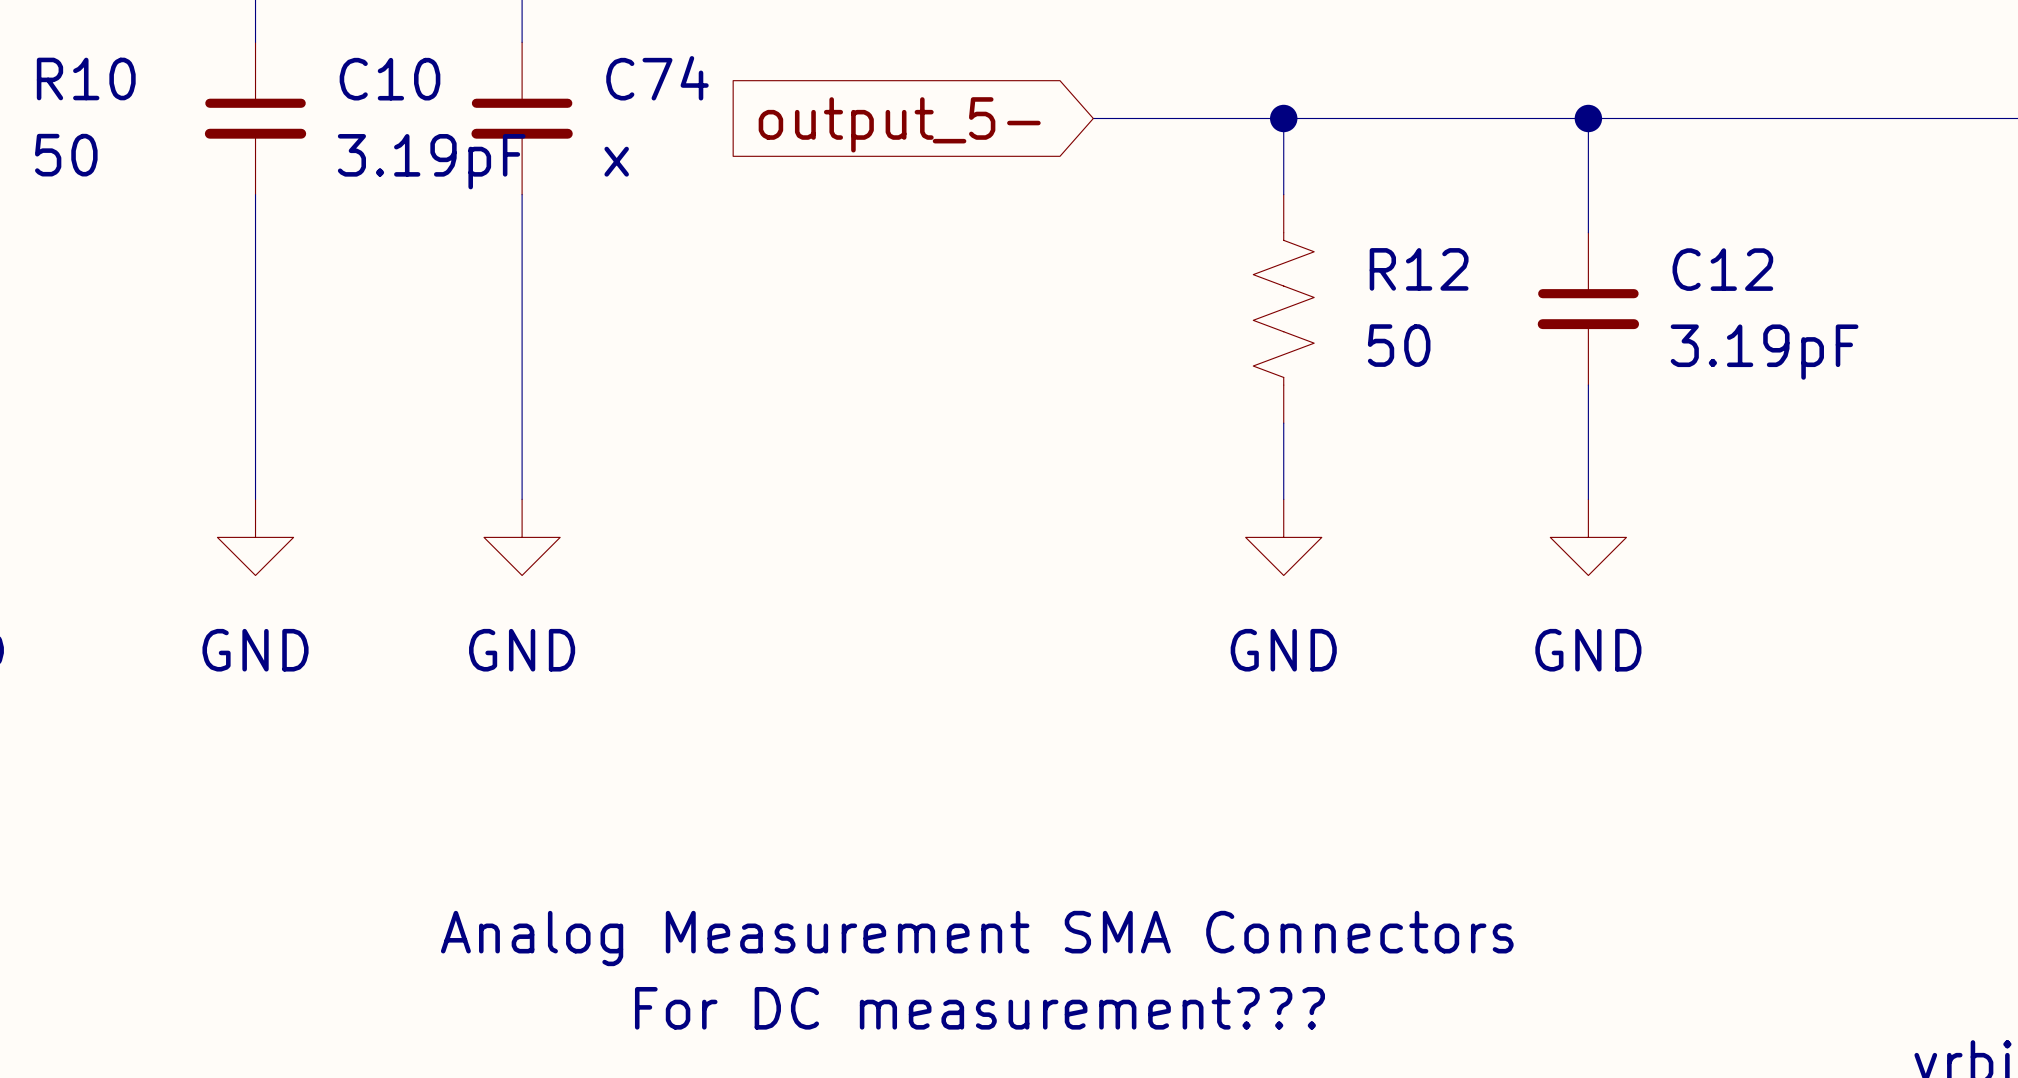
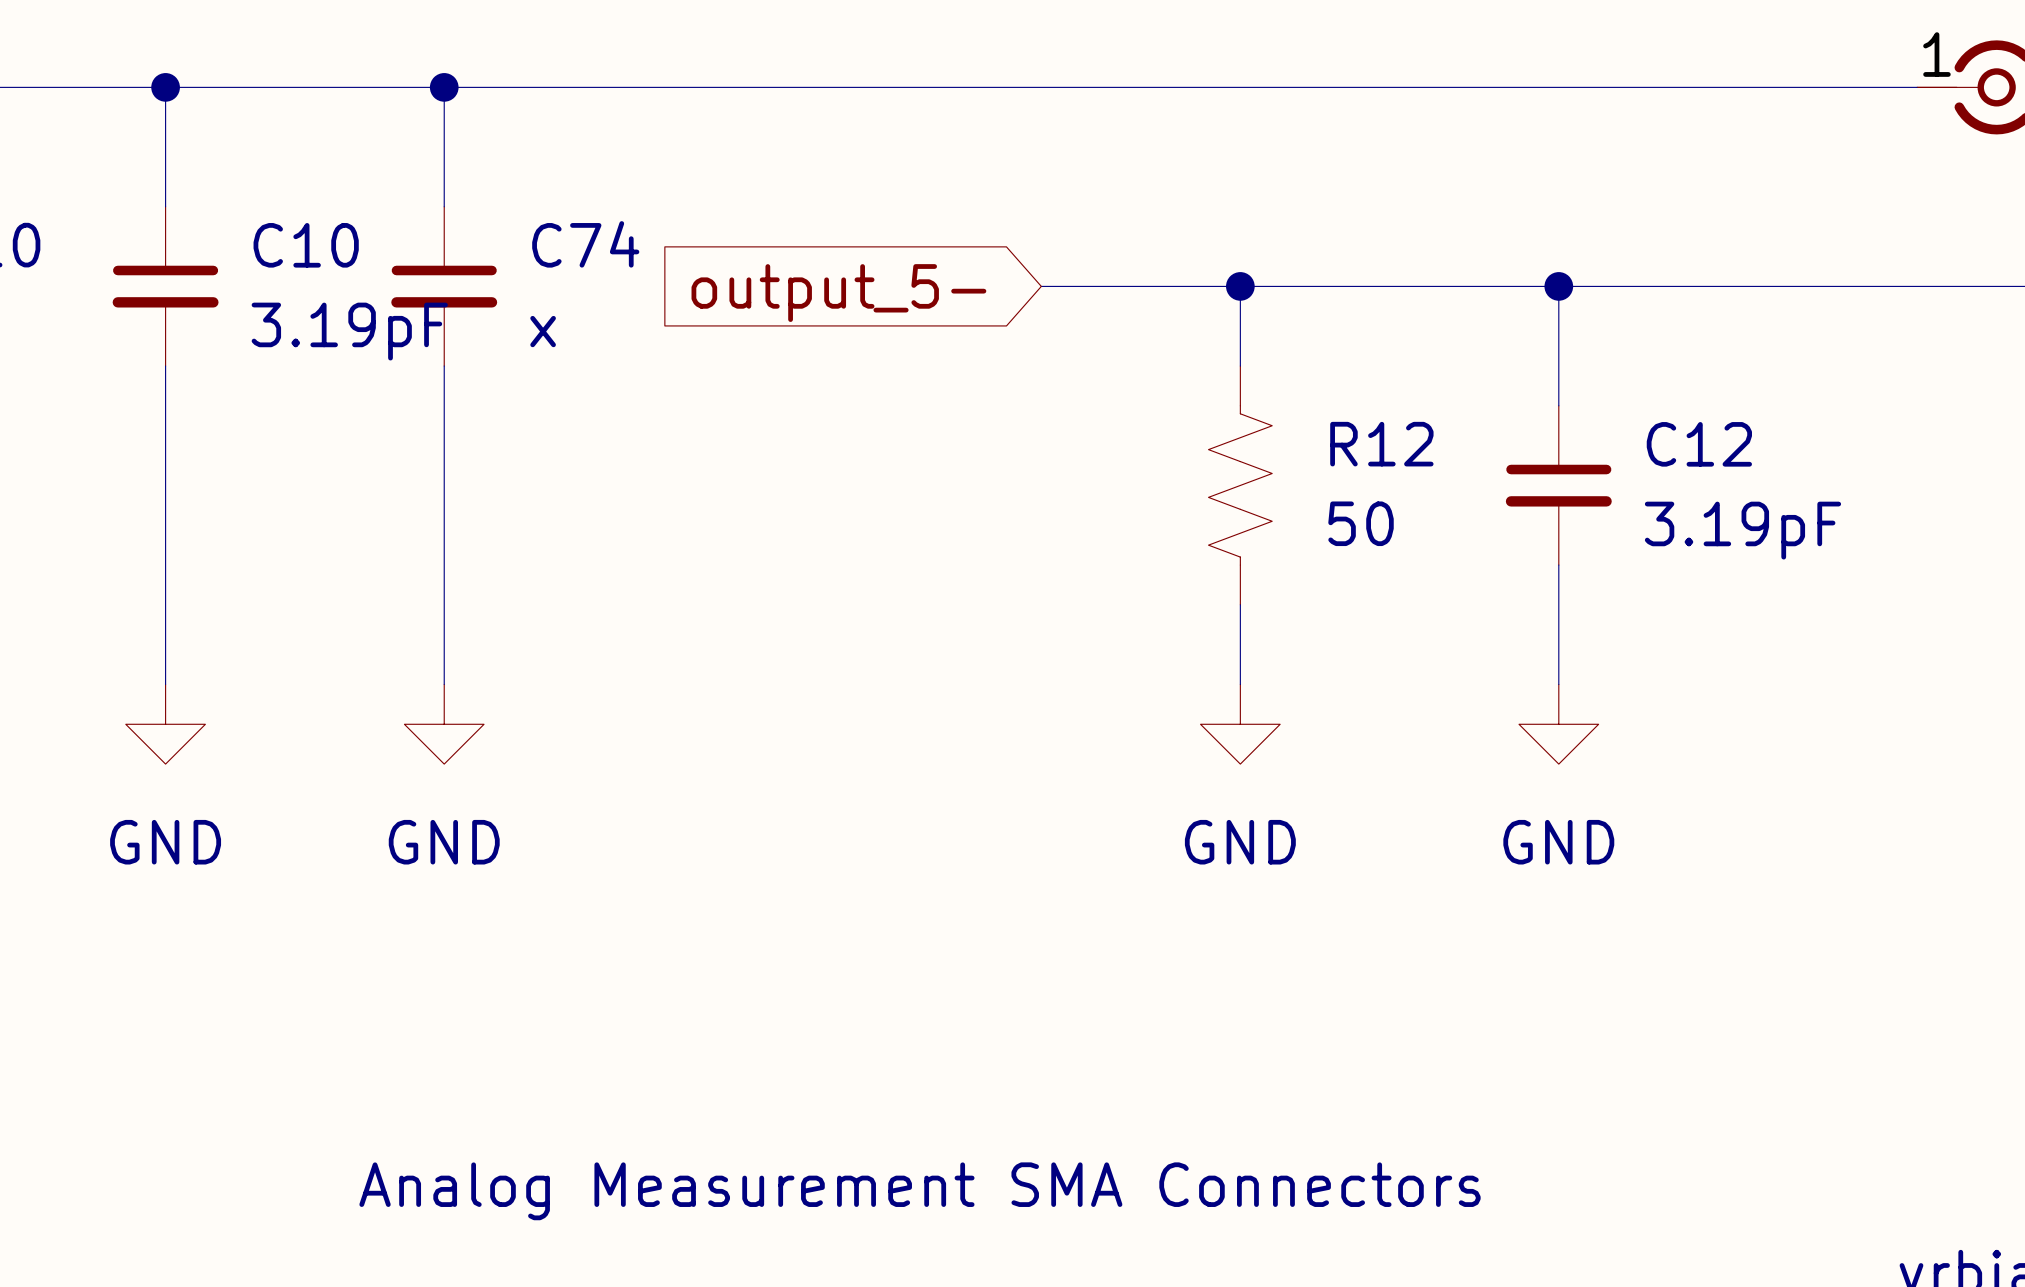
text position: Analog Measurement SMA Connectors (977, 938) -> Analog Measurement SMA Connectors (920, 1191)
text: For DC measurement??? (979, 1008) -> none

